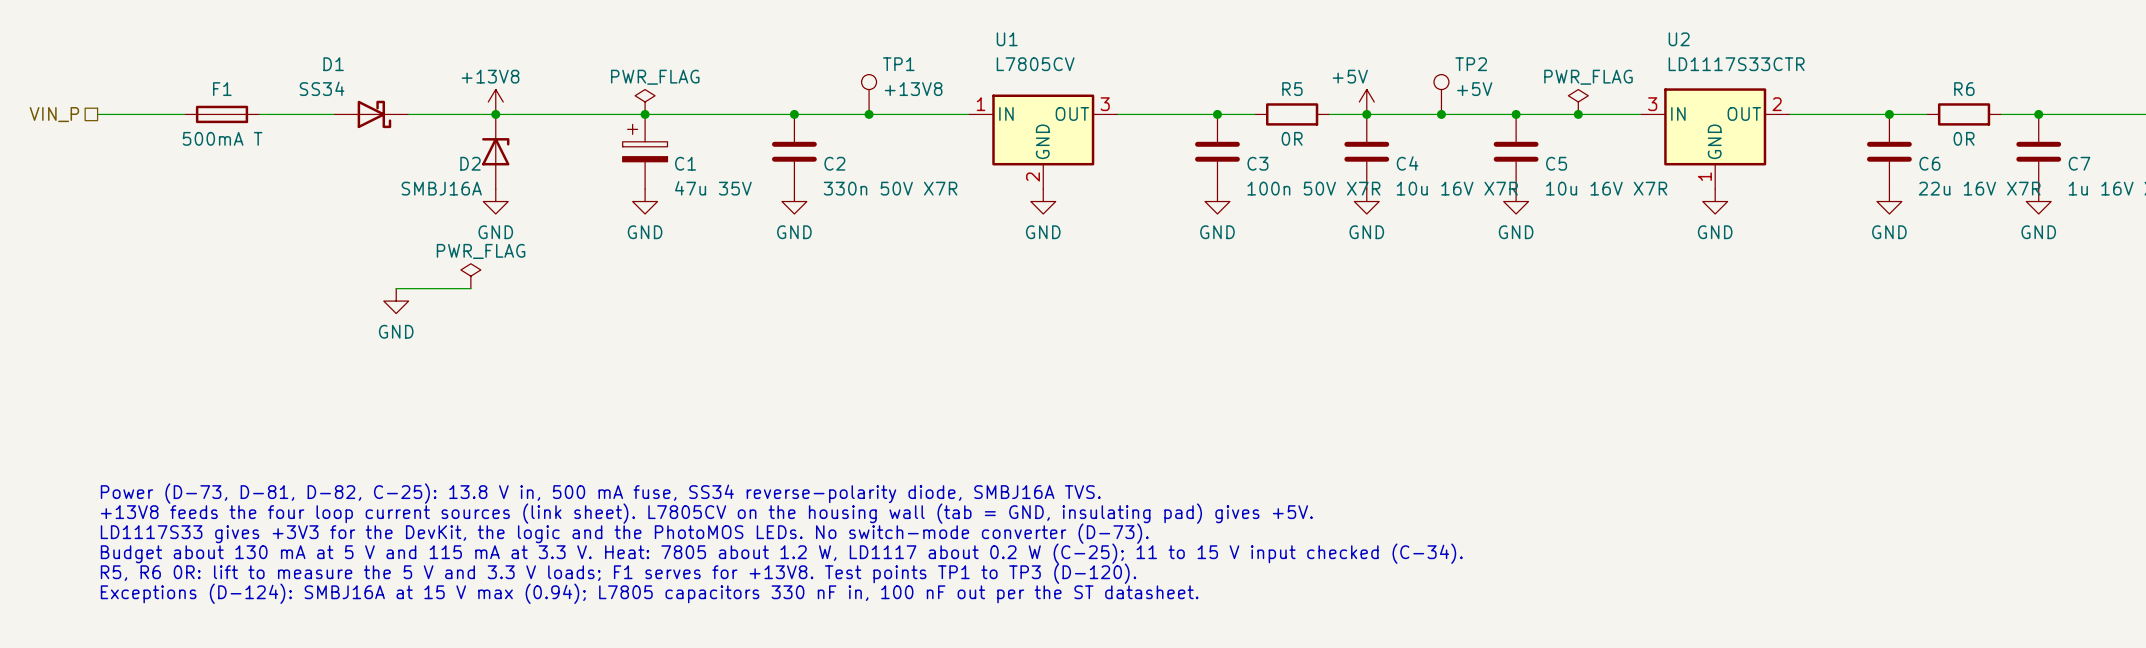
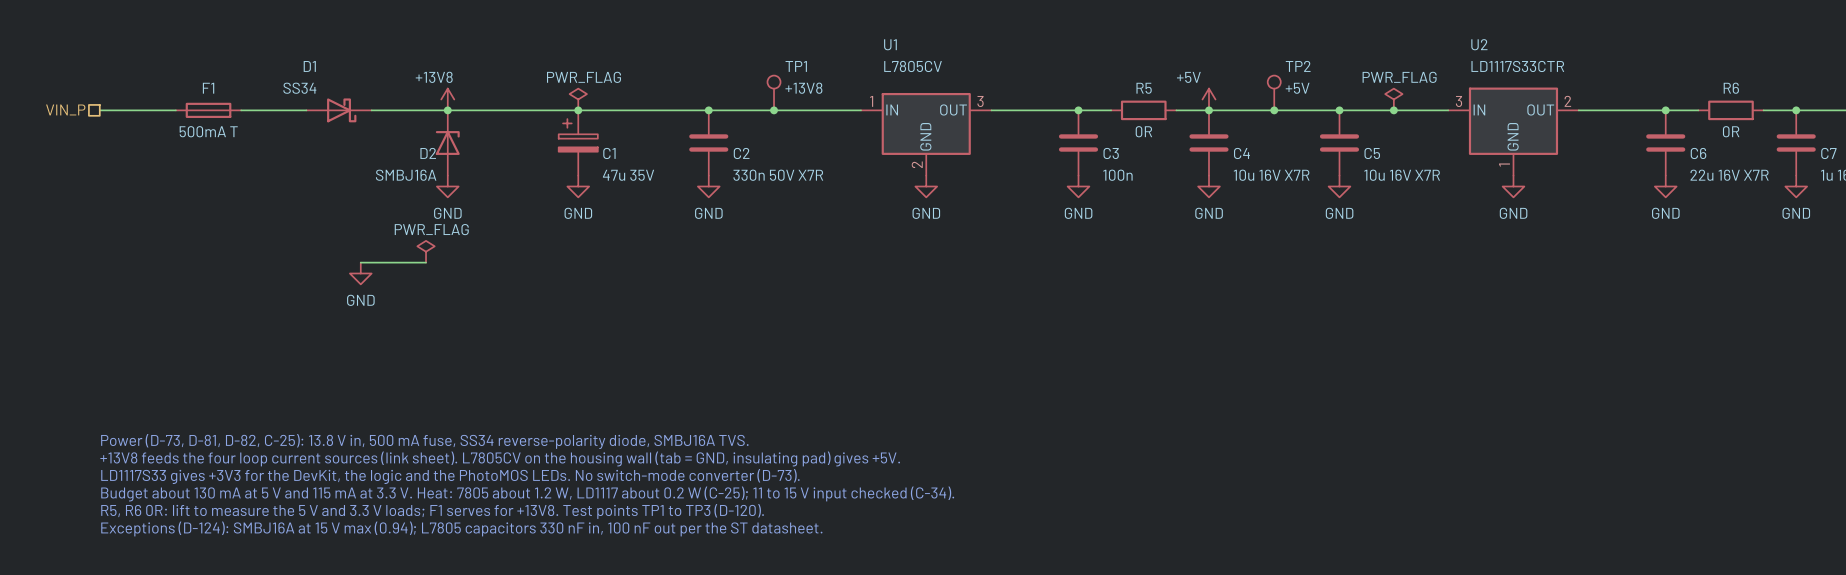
C3 value: 100n 50V X7R (1313, 188) -> 100n (1117, 175)

